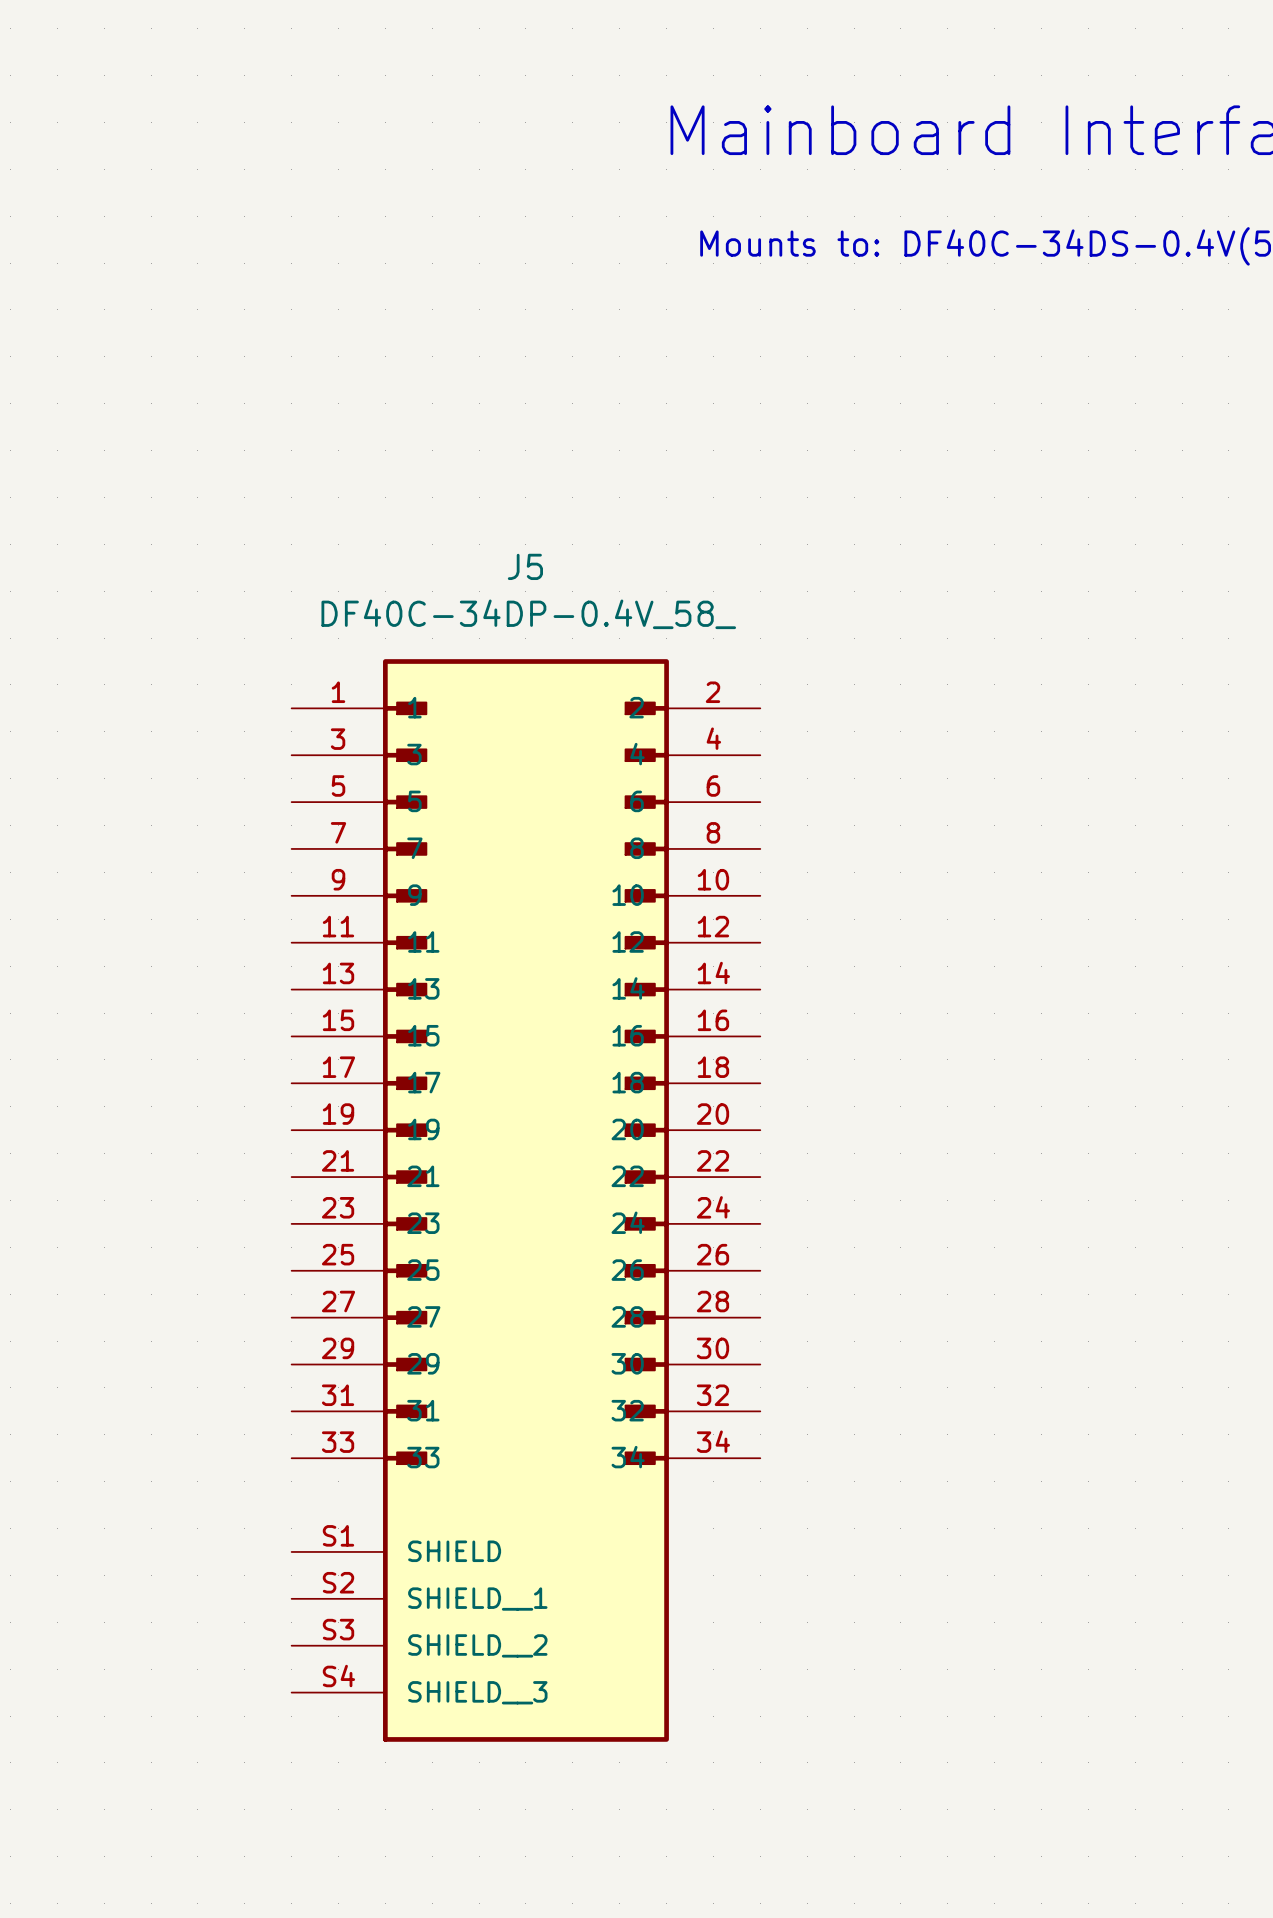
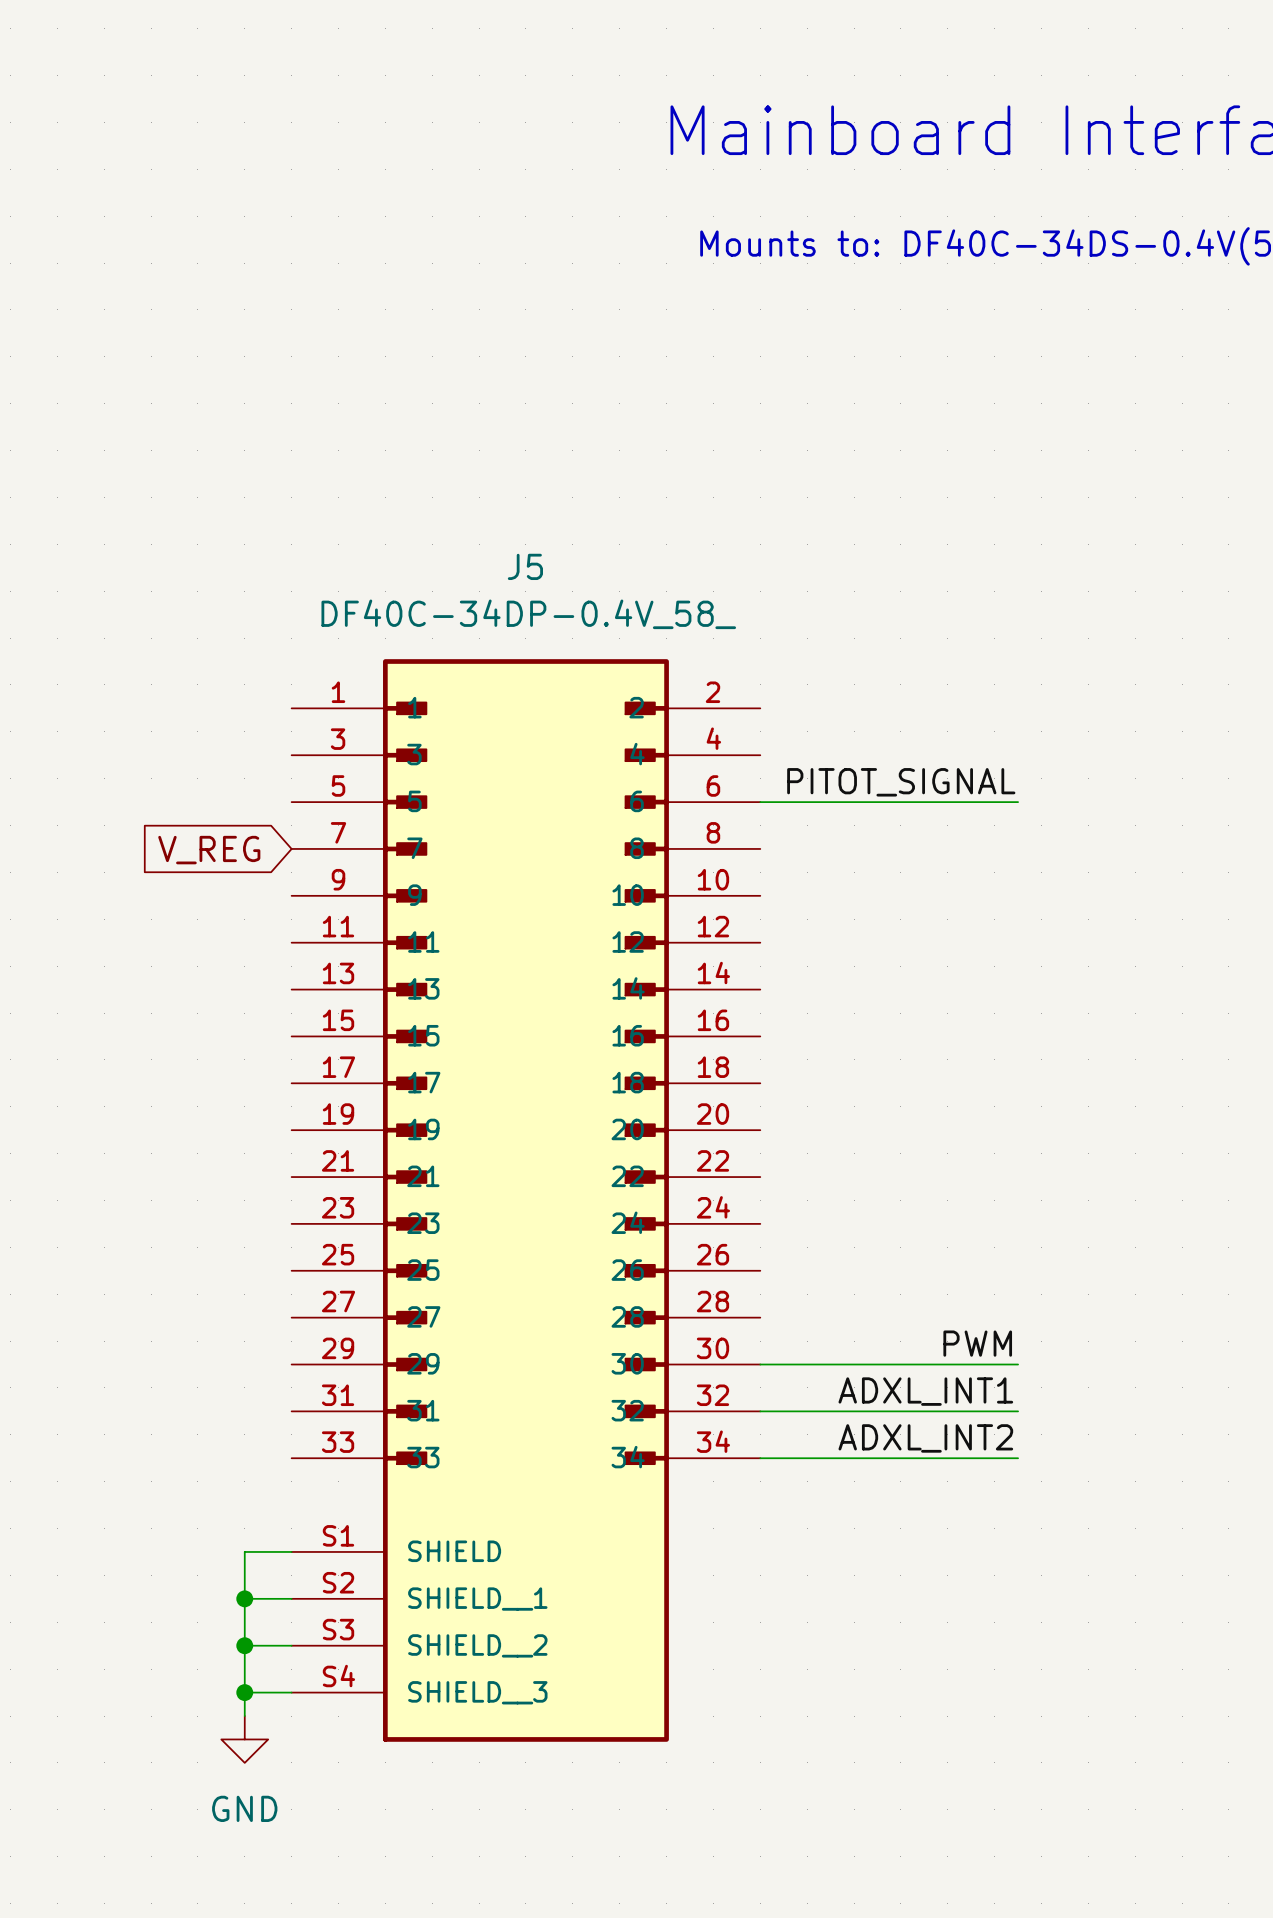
label: none -> PITOT_SIGNAL (901, 782)
wire: none -> (760, 802) (1018, 802)
global label: none -> V_REG (209, 850)
label: none -> PWM (977, 1343)
wire: none -> (760, 1364) (1018, 1364)
label: none -> ADXL_INT1 (925, 1391)
wire: none -> (760, 1411) (1018, 1411)
label: none -> ADXL_INT2 (925, 1438)
wire: none -> (760, 1458) (1018, 1458)
wire: none -> (291, 1551) (244, 1551) (244, 1716)
wire: none -> (244, 1598) (291, 1598)
junction: none -> (244, 1598)
wire: none -> (244, 1645) (291, 1645)
junction: none -> (244, 1645)
wire: none -> (244, 1692) (291, 1692)
junction: none -> (244, 1692)
power symbol: none -> GND (244, 1739)

